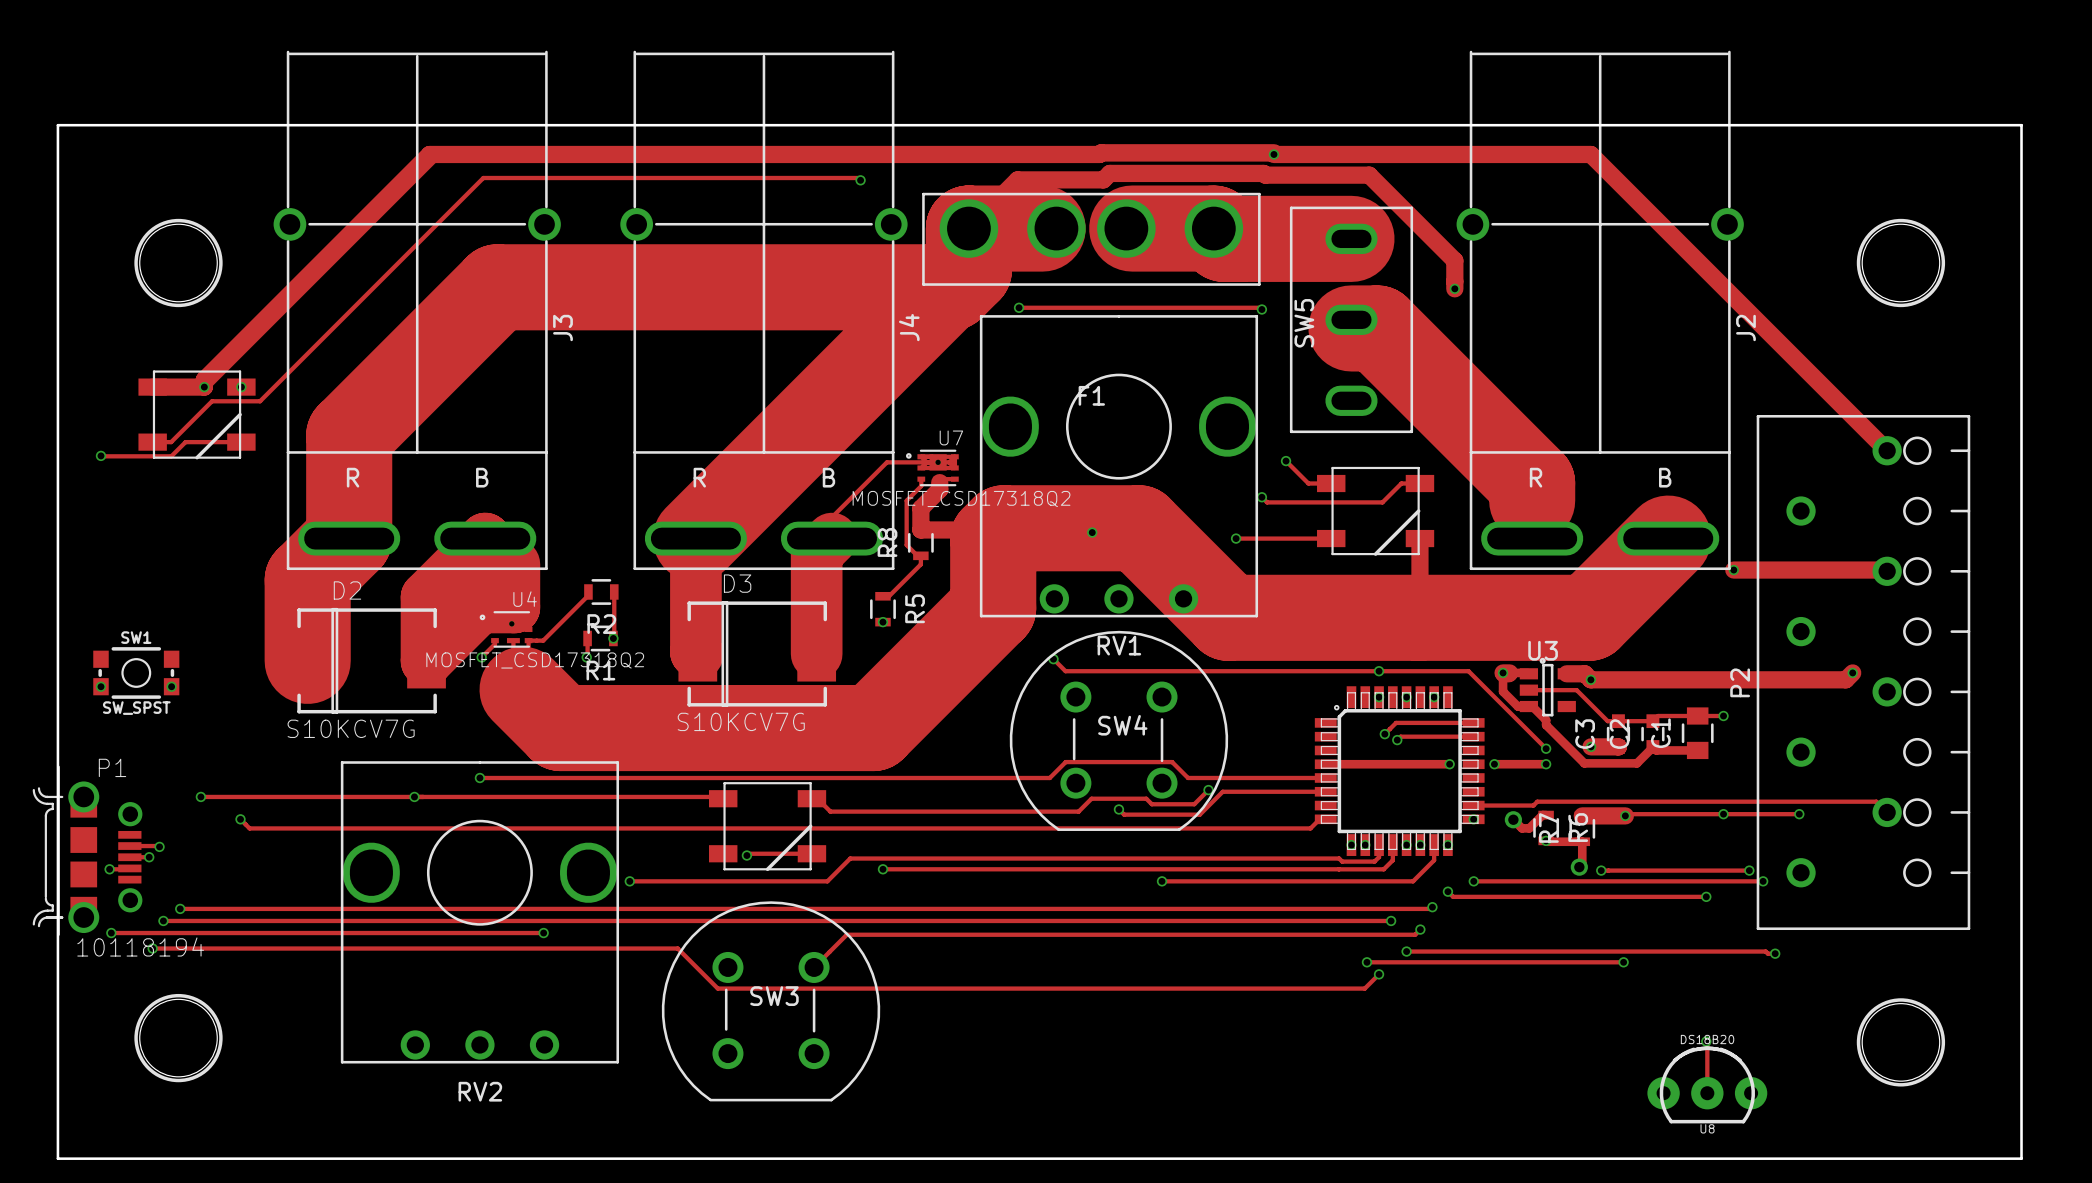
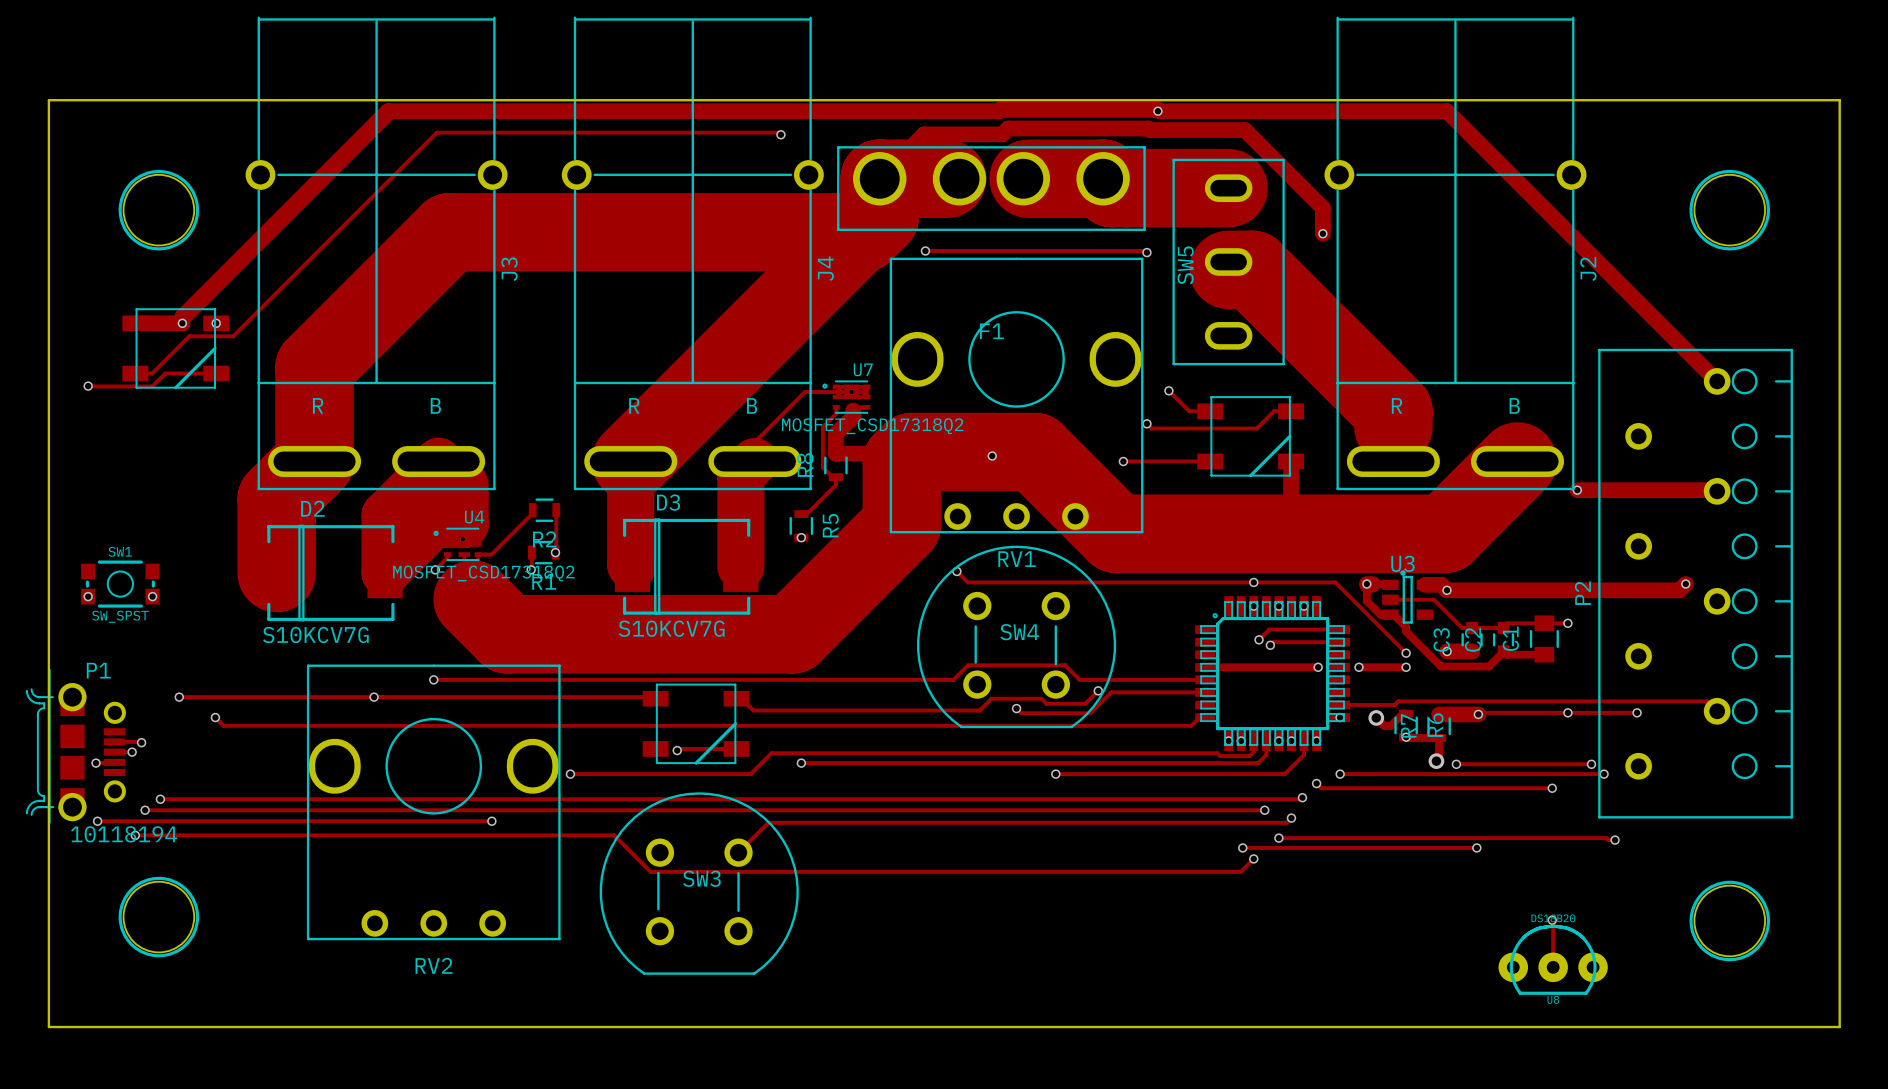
board edge: (57, 142) (57, 125) (2021, 125) (2021, 142) -> (48, 100) (1839, 100)

